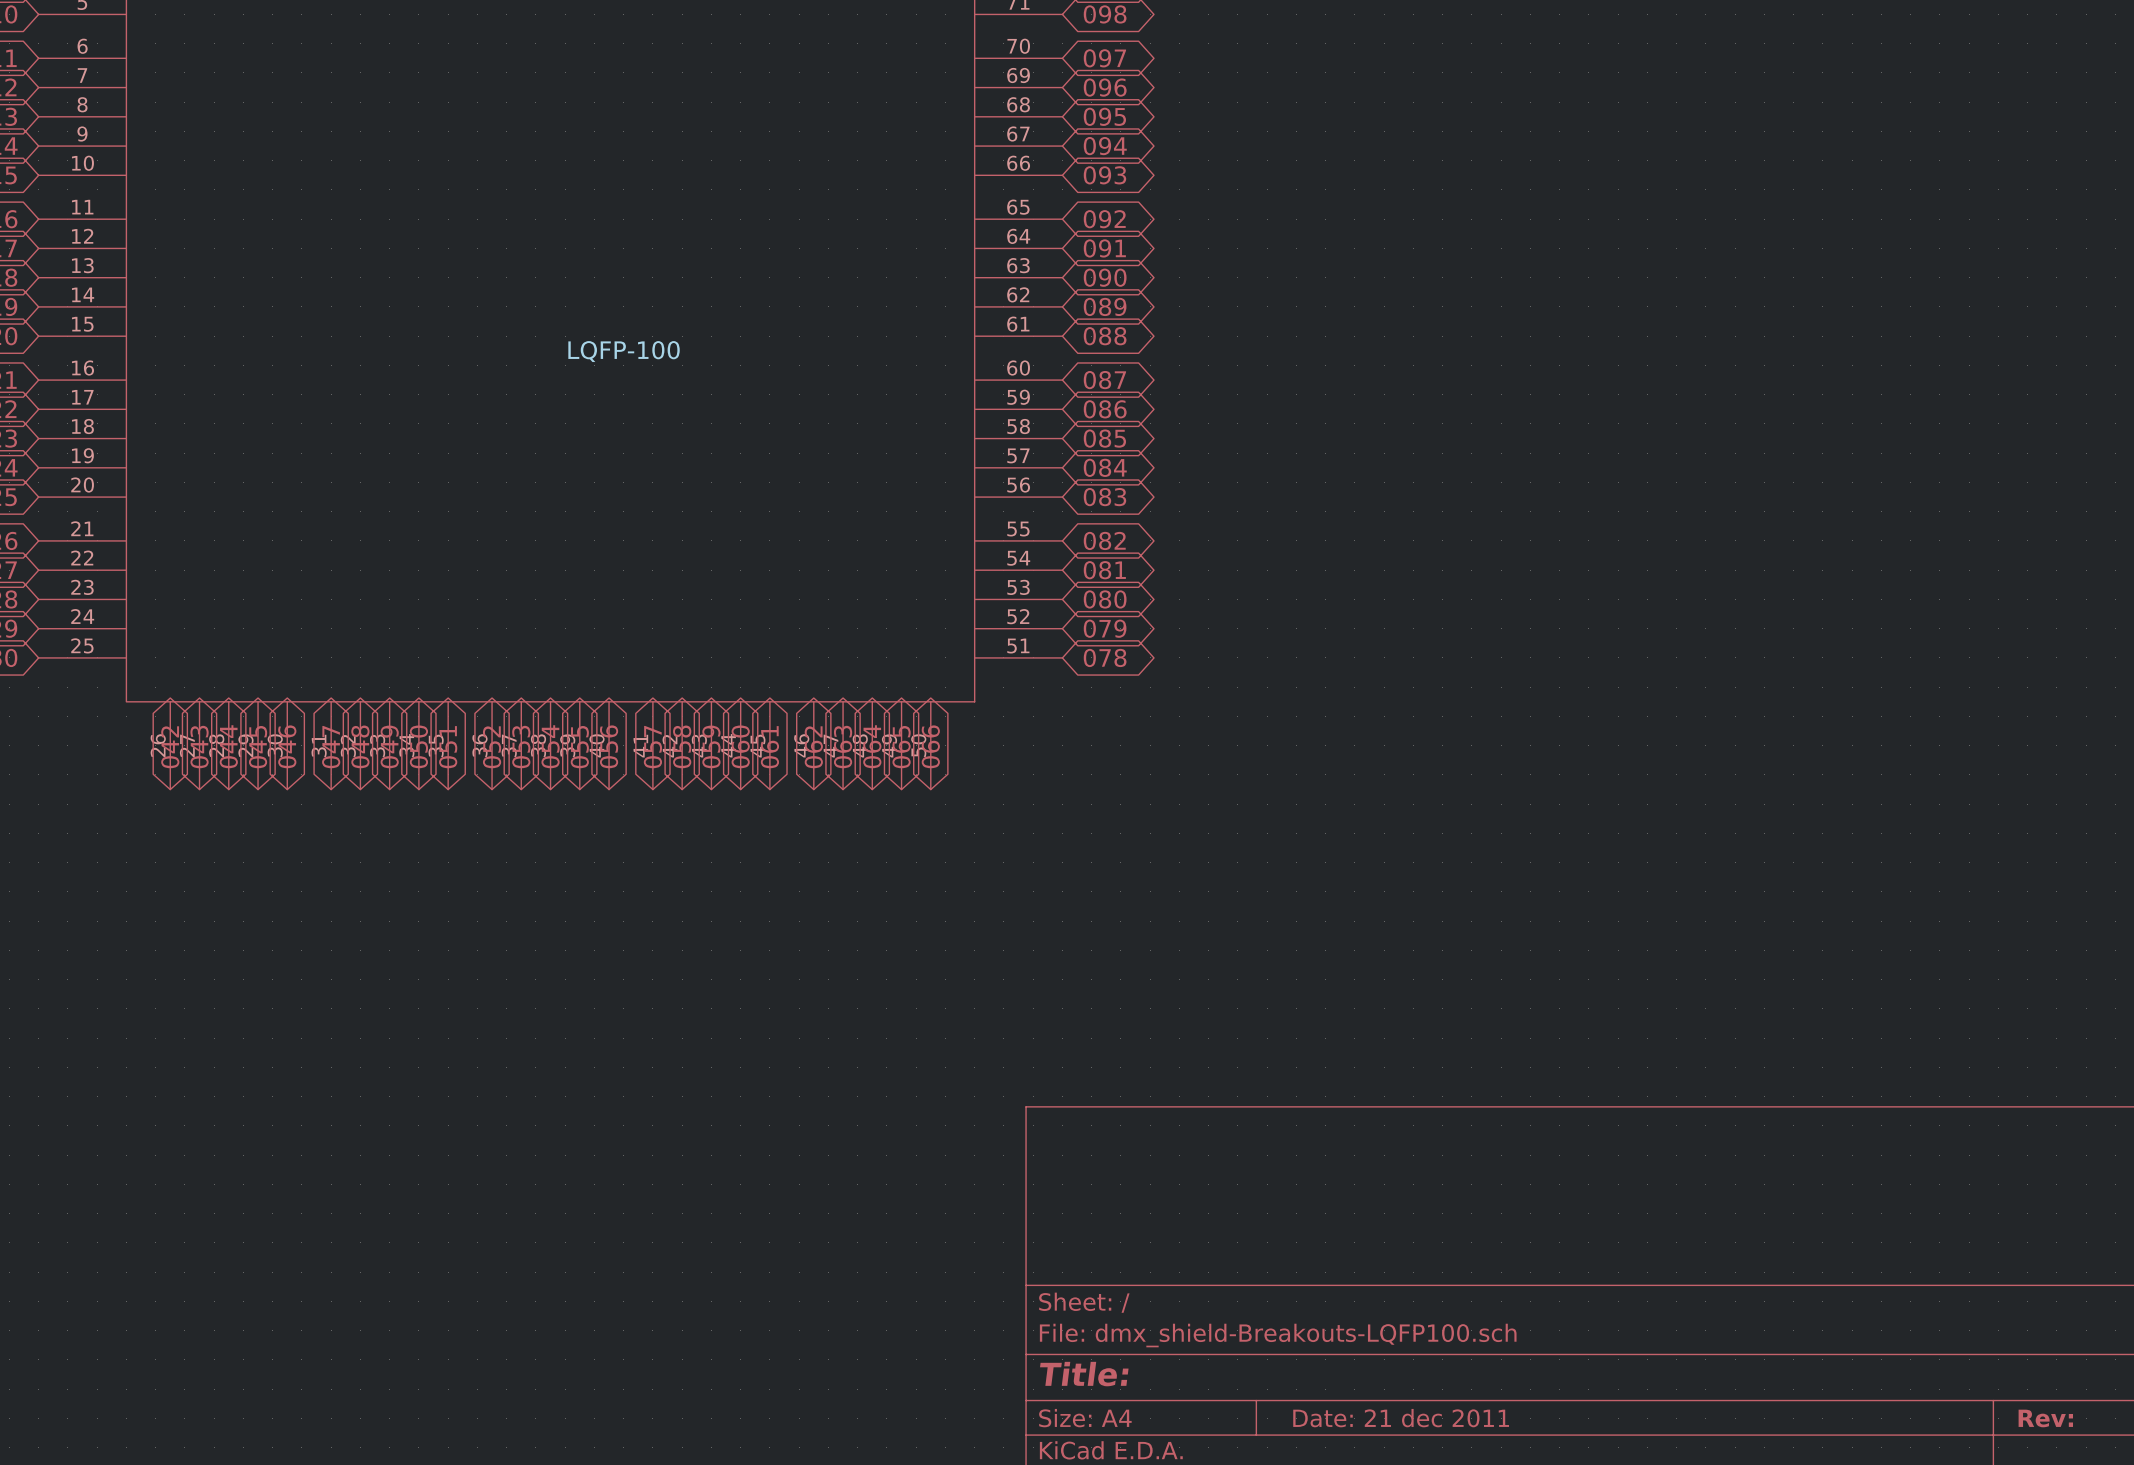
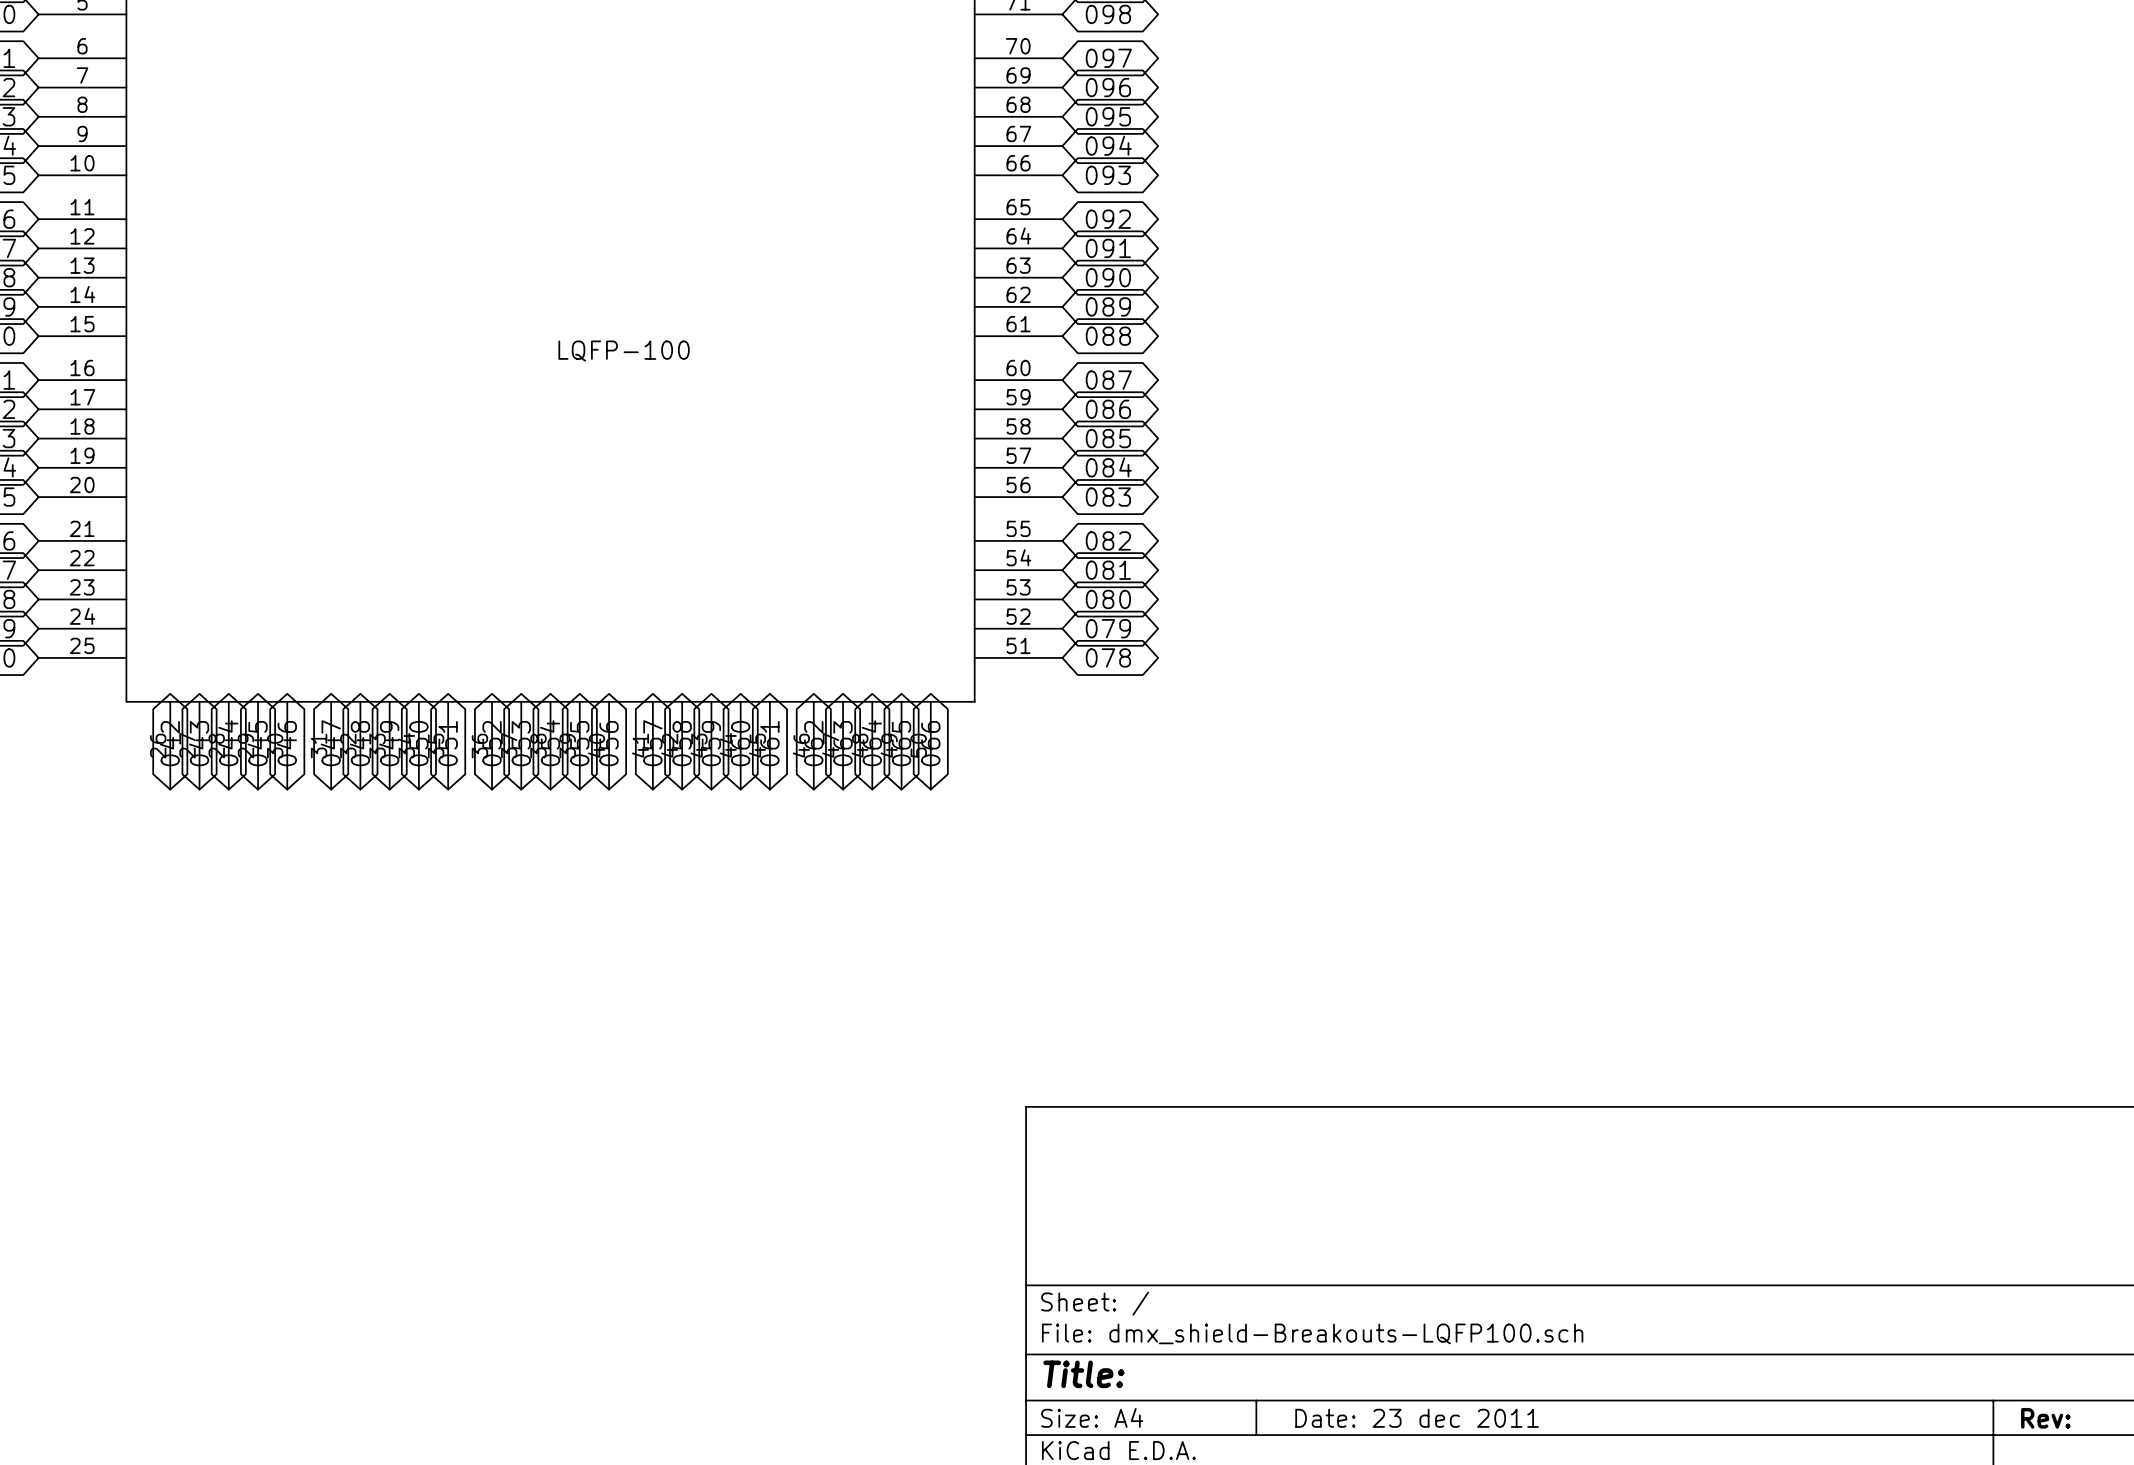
title block: Date: 21 dec 2011 (1401, 1418) -> Date: 23 dec 2011 (1417, 1418)

